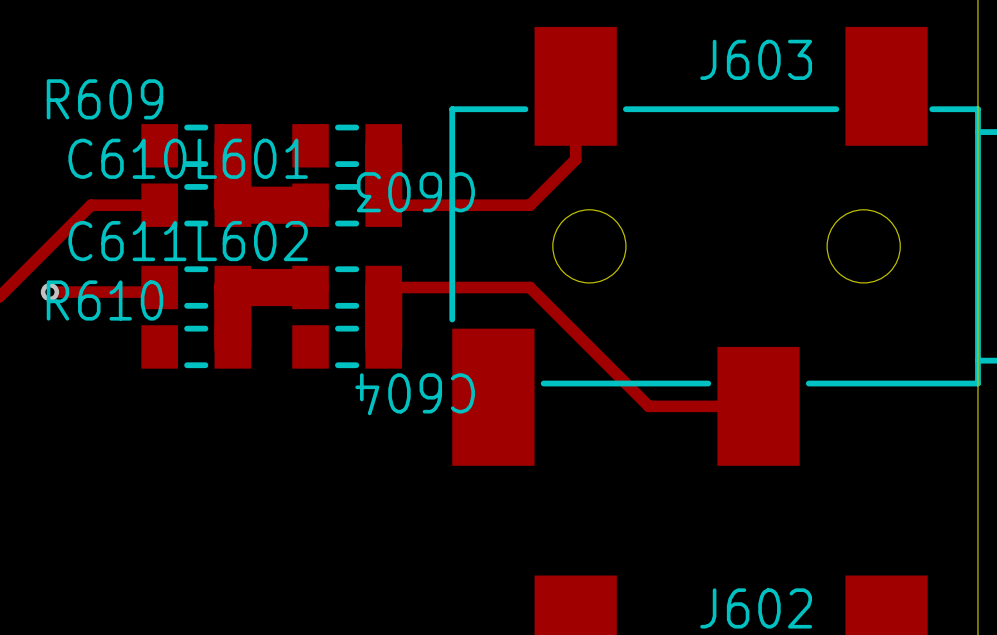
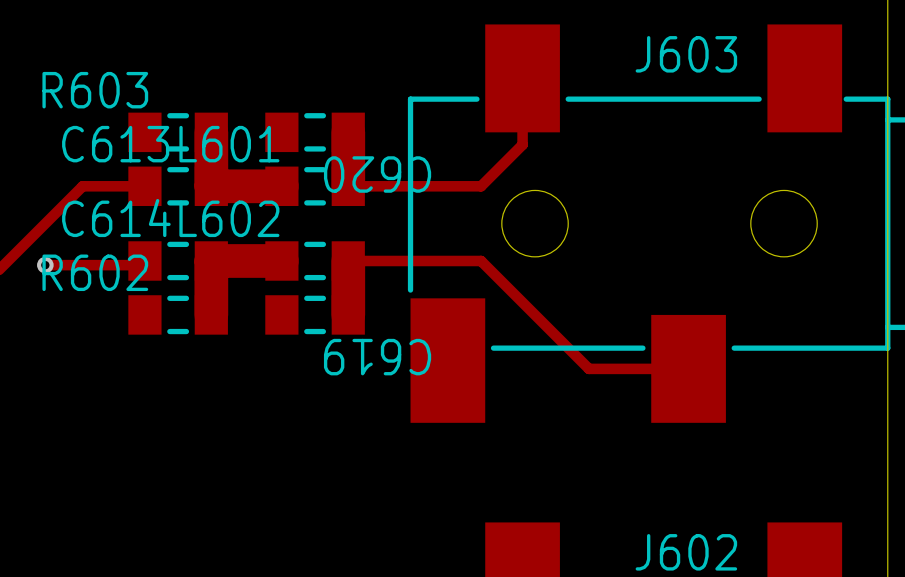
R609 name: R609 (104, 99) -> R603 (95, 90)
C610 name: C610 (127, 158) -> C613 (115, 144)
C603 name: C603 (415, 192) -> C620 (377, 174)
C611 name: C611 (127, 241) -> C614 (116, 218)
R610 name: R610 (104, 300) -> R602 (95, 272)
C604 name: C604 (415, 394) -> C619 (377, 357)

